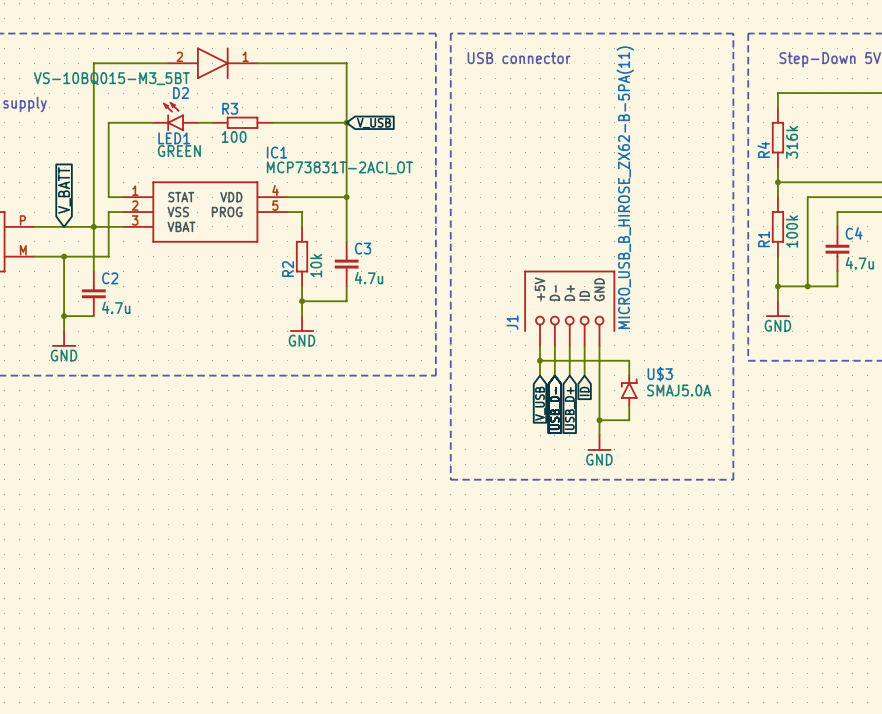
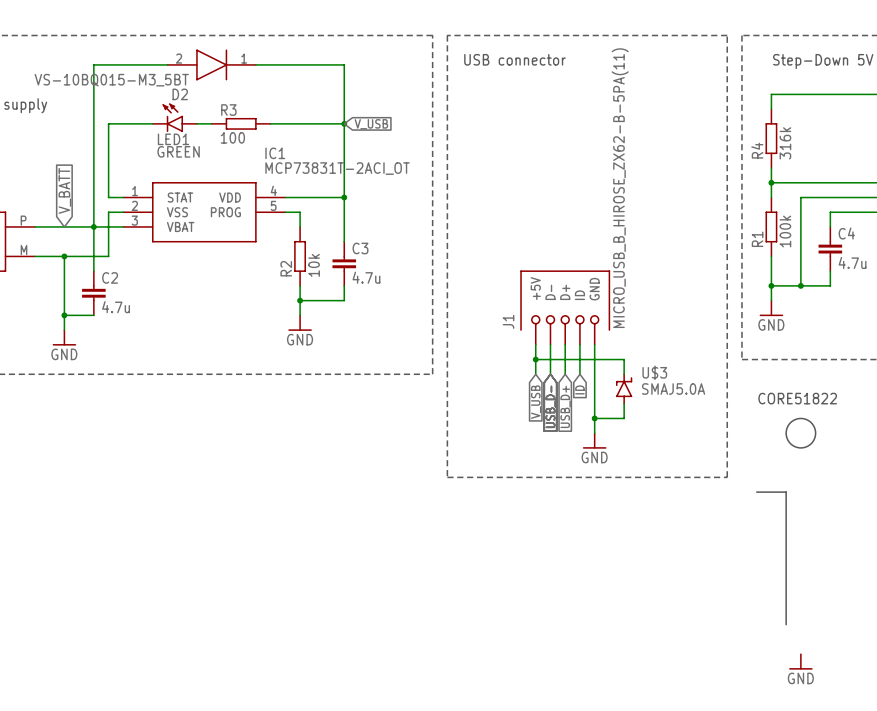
text: none -> CORE51822 (797, 398)
drawing: none -> [785, 418, 817, 449]
bus: none -> (756, 492) (786, 492) (786, 624)
power symbol: none -> GND (800, 661)

